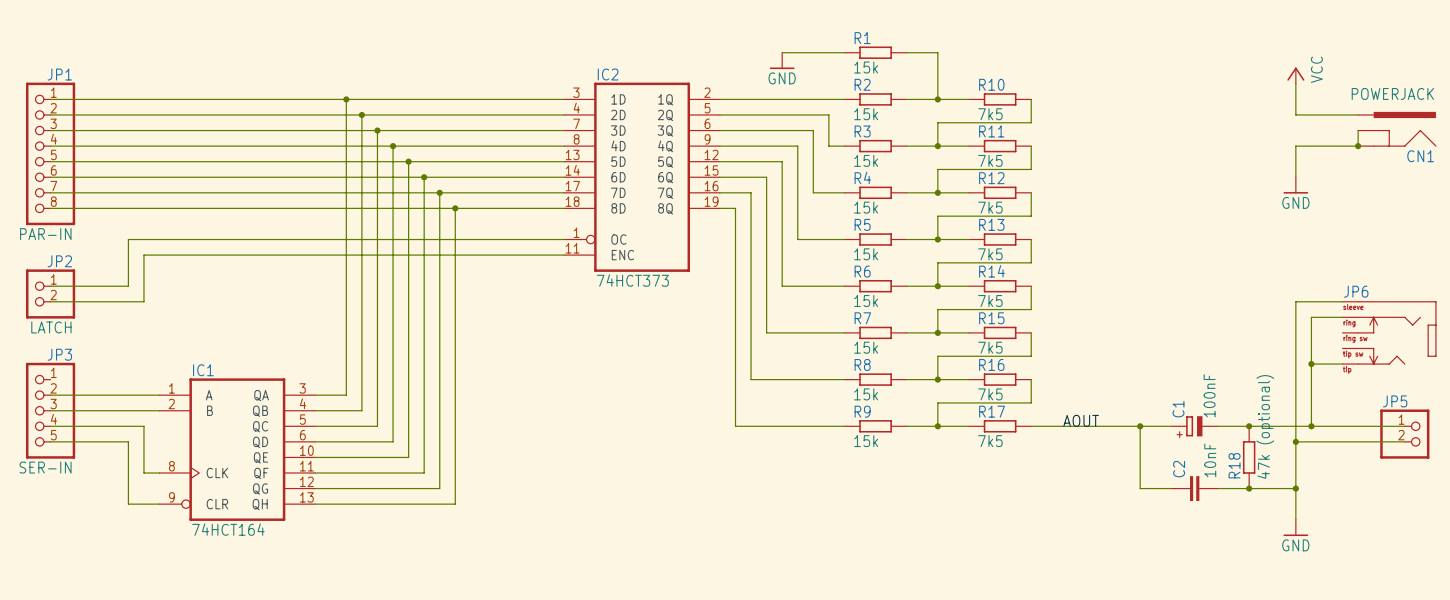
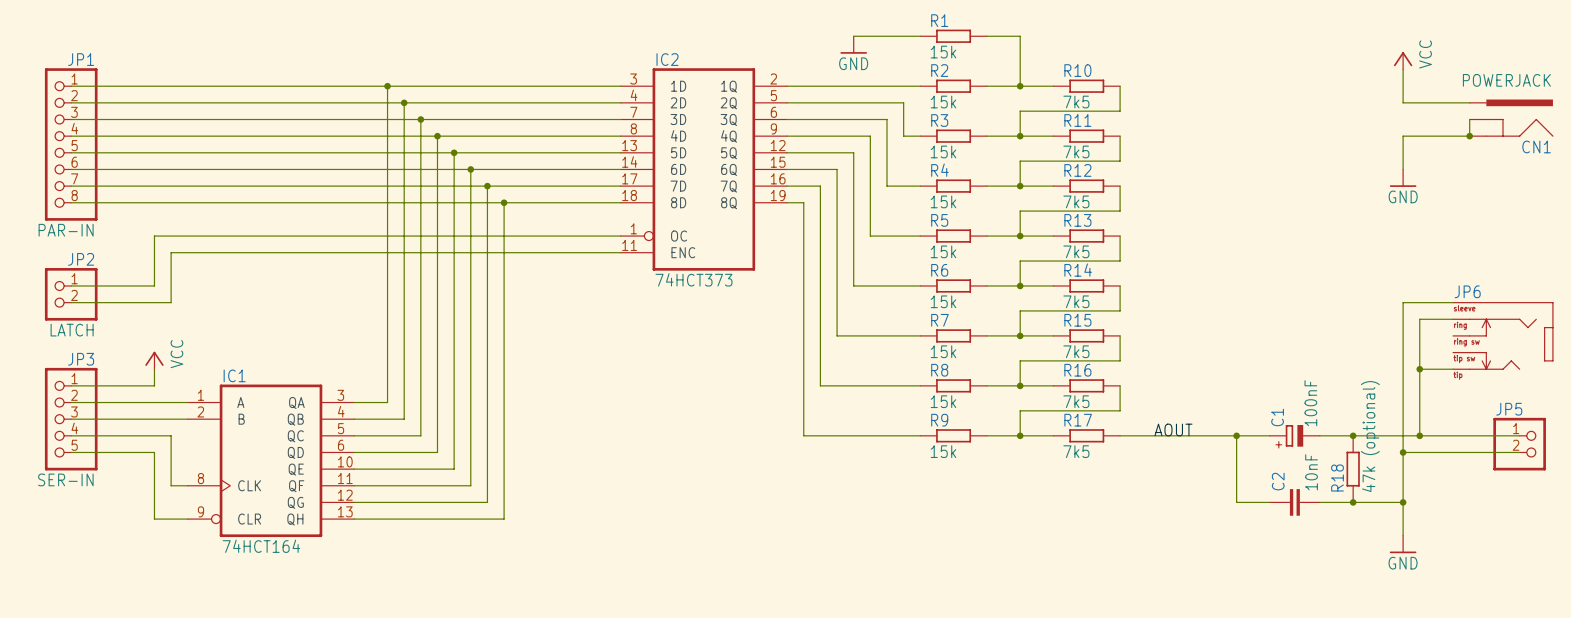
power symbol: none -> VCC (154, 360)
wire: none -> (154, 369) (154, 385) (71, 385)

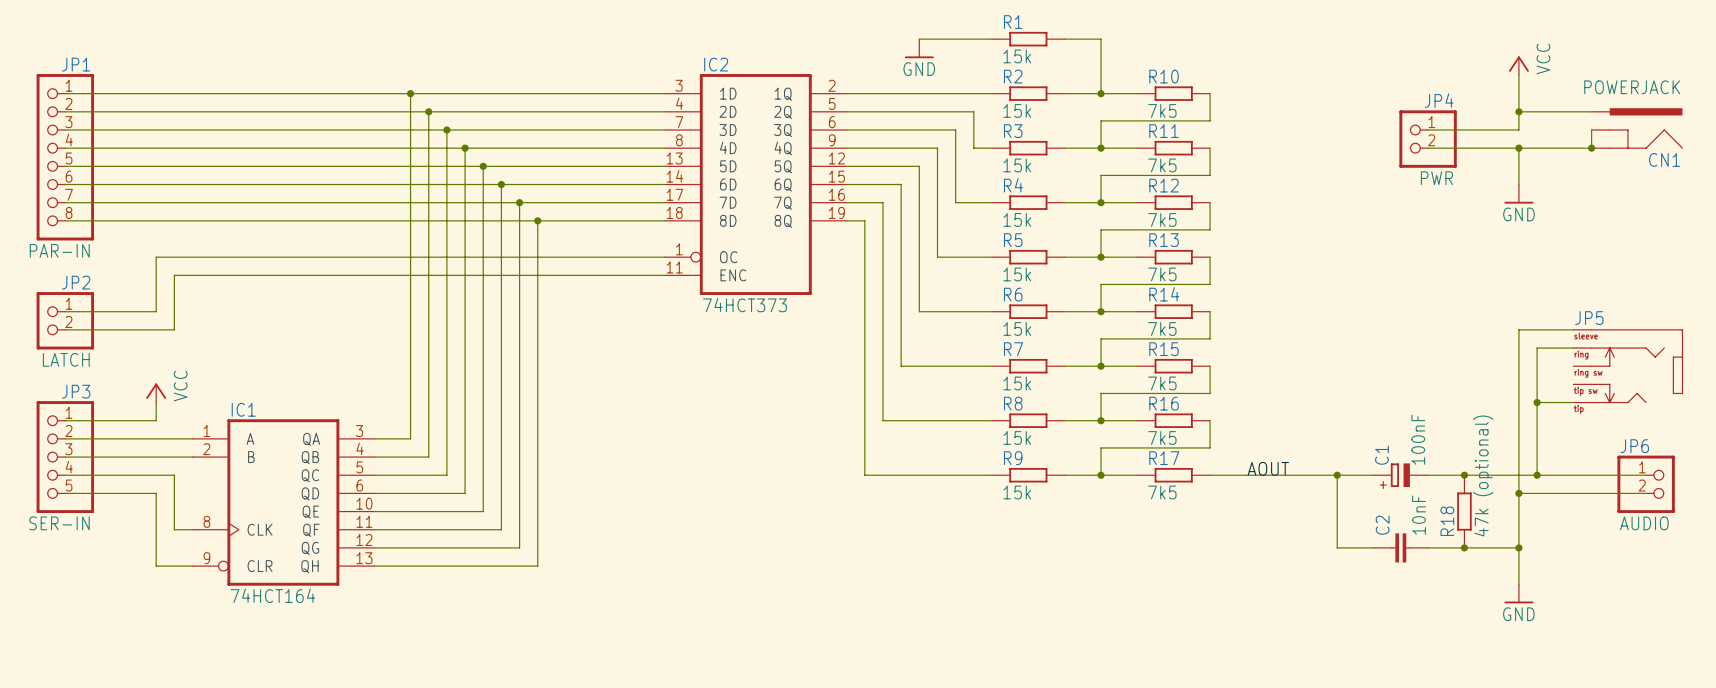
wire: none -> (1518, 111) (1518, 129) (1428, 129)
junction: none -> (1518, 111)
JP4: none -> PWR (1428, 139)
wire: none -> (1428, 148) (1518, 148)
junction: none -> (1518, 148)
JP6 name: JP6 (1467, 291) -> JP5 (1589, 318)
JP5 name: JP5 (1509, 409) -> JP6 (1634, 446)
JP5 value: none -> AUDIO (1644, 523)

